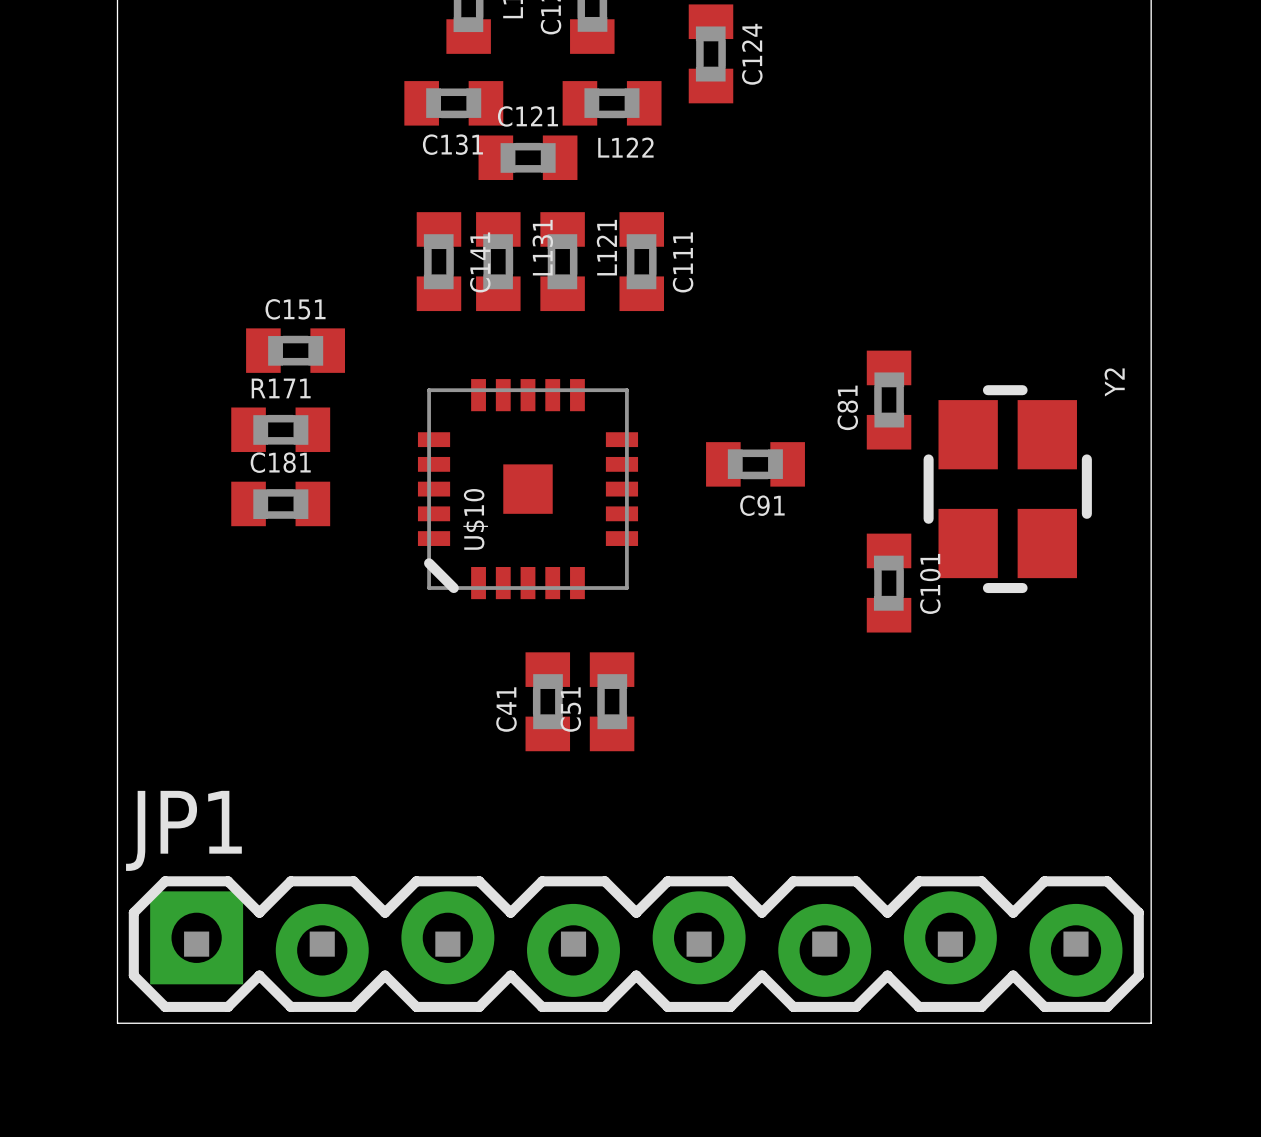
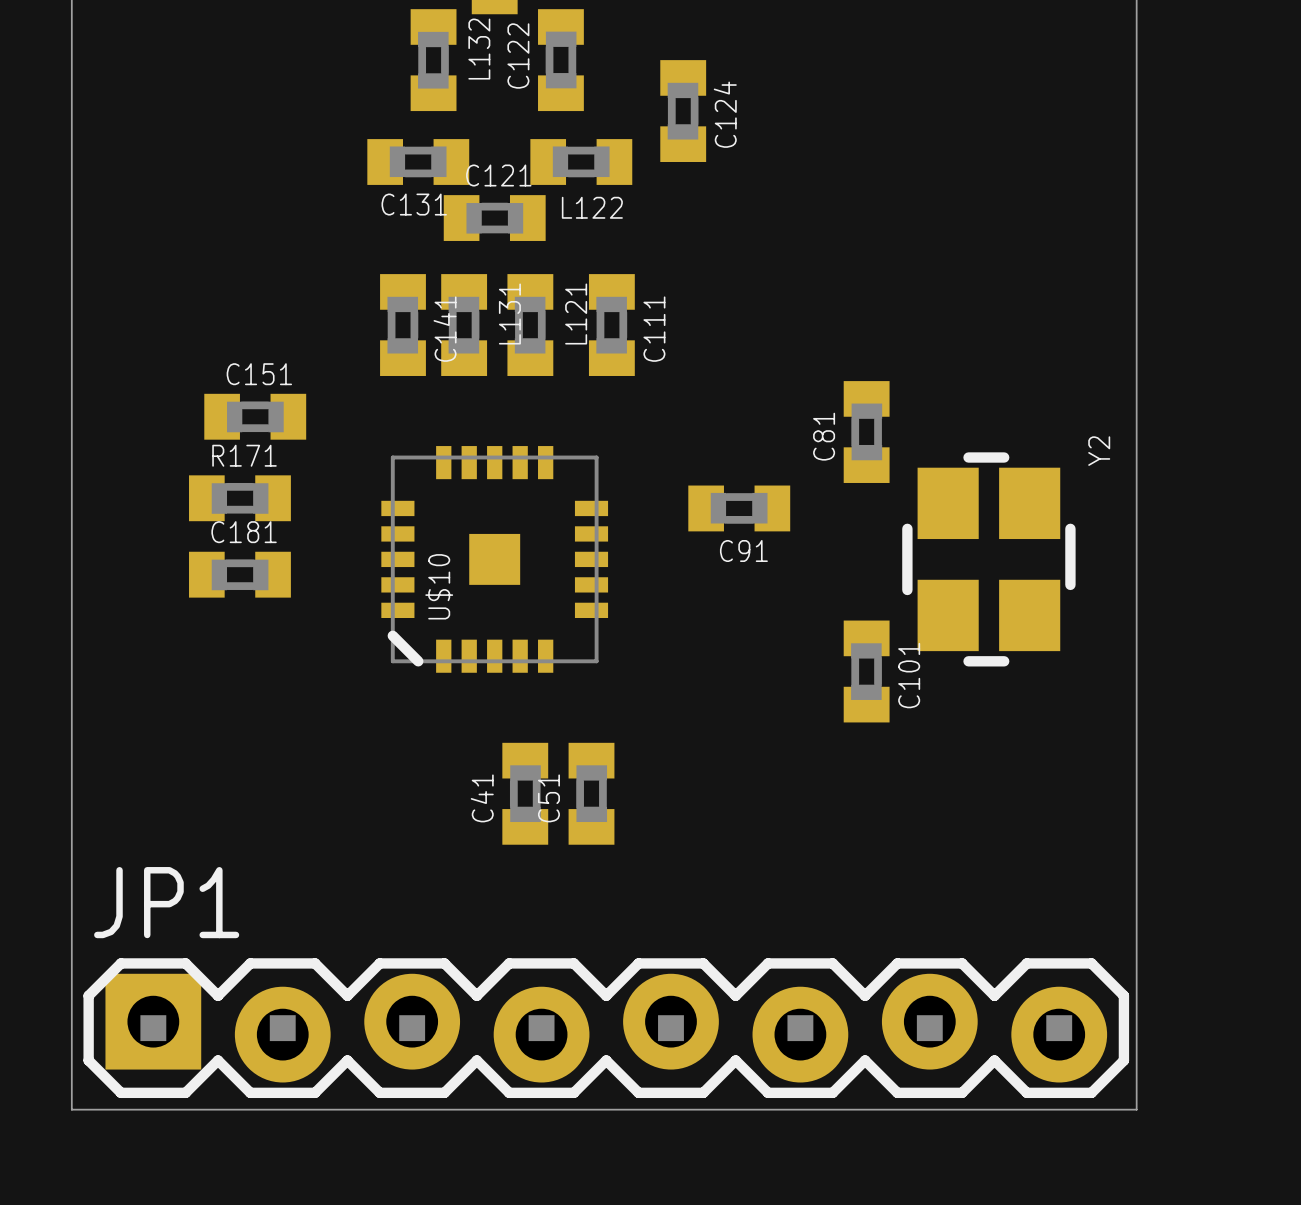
C81 position: (889, 400) -> (866, 432)
C91 position: (755, 464) -> (739, 508)
C101 position: (889, 583) -> (866, 671)
C41 position: (547, 701) -> (525, 793)
C51 position: (612, 701) -> (591, 793)

